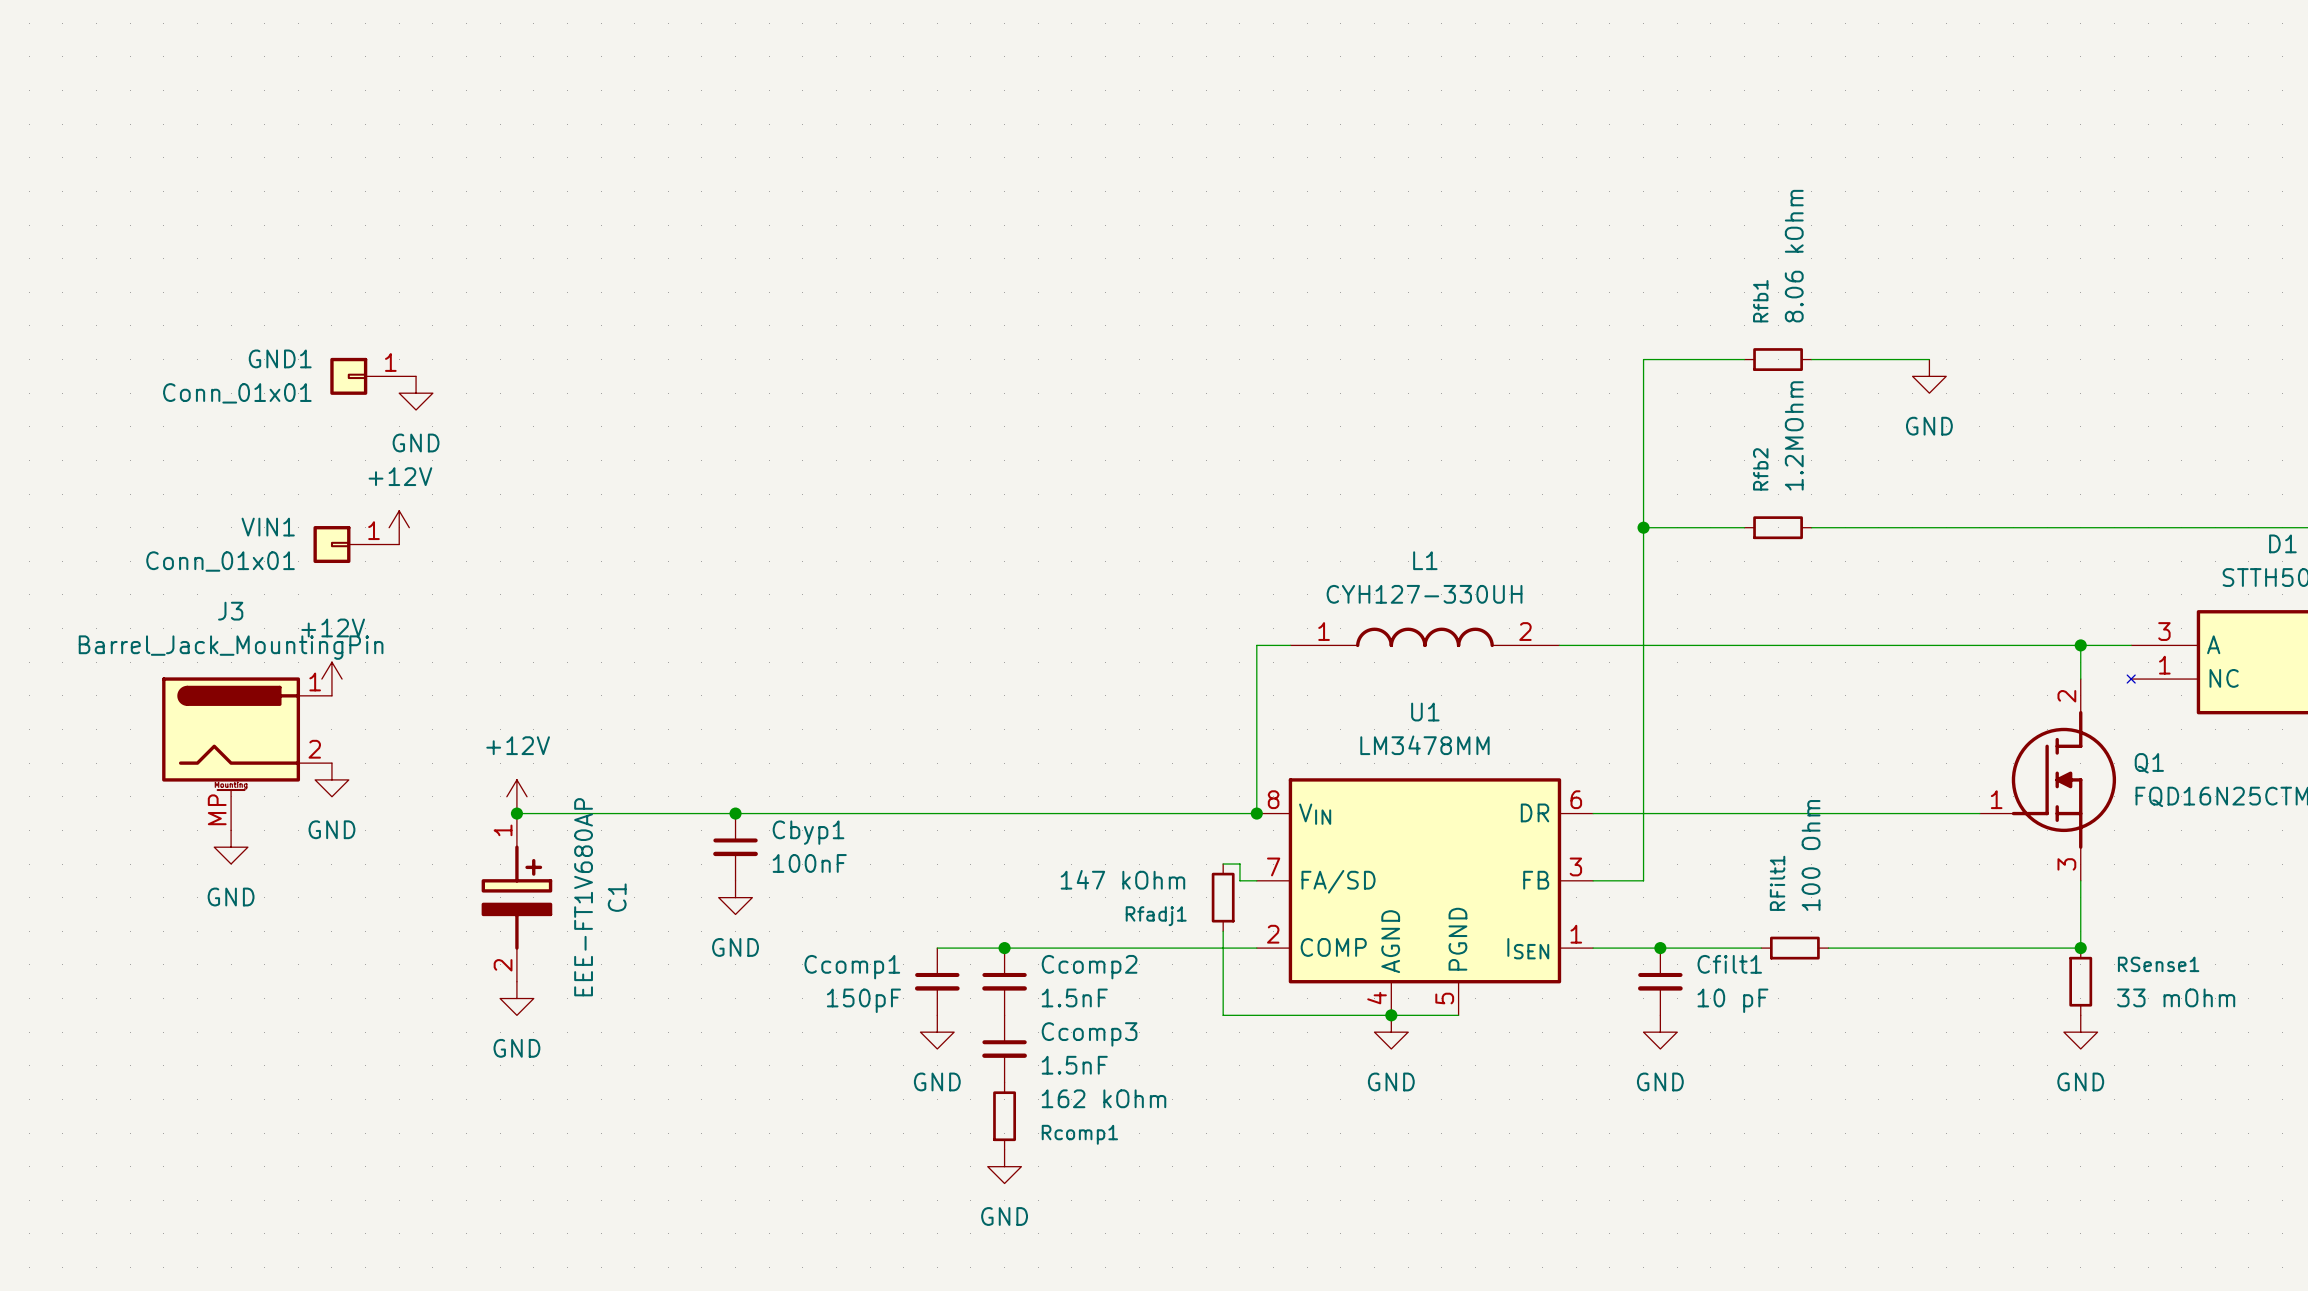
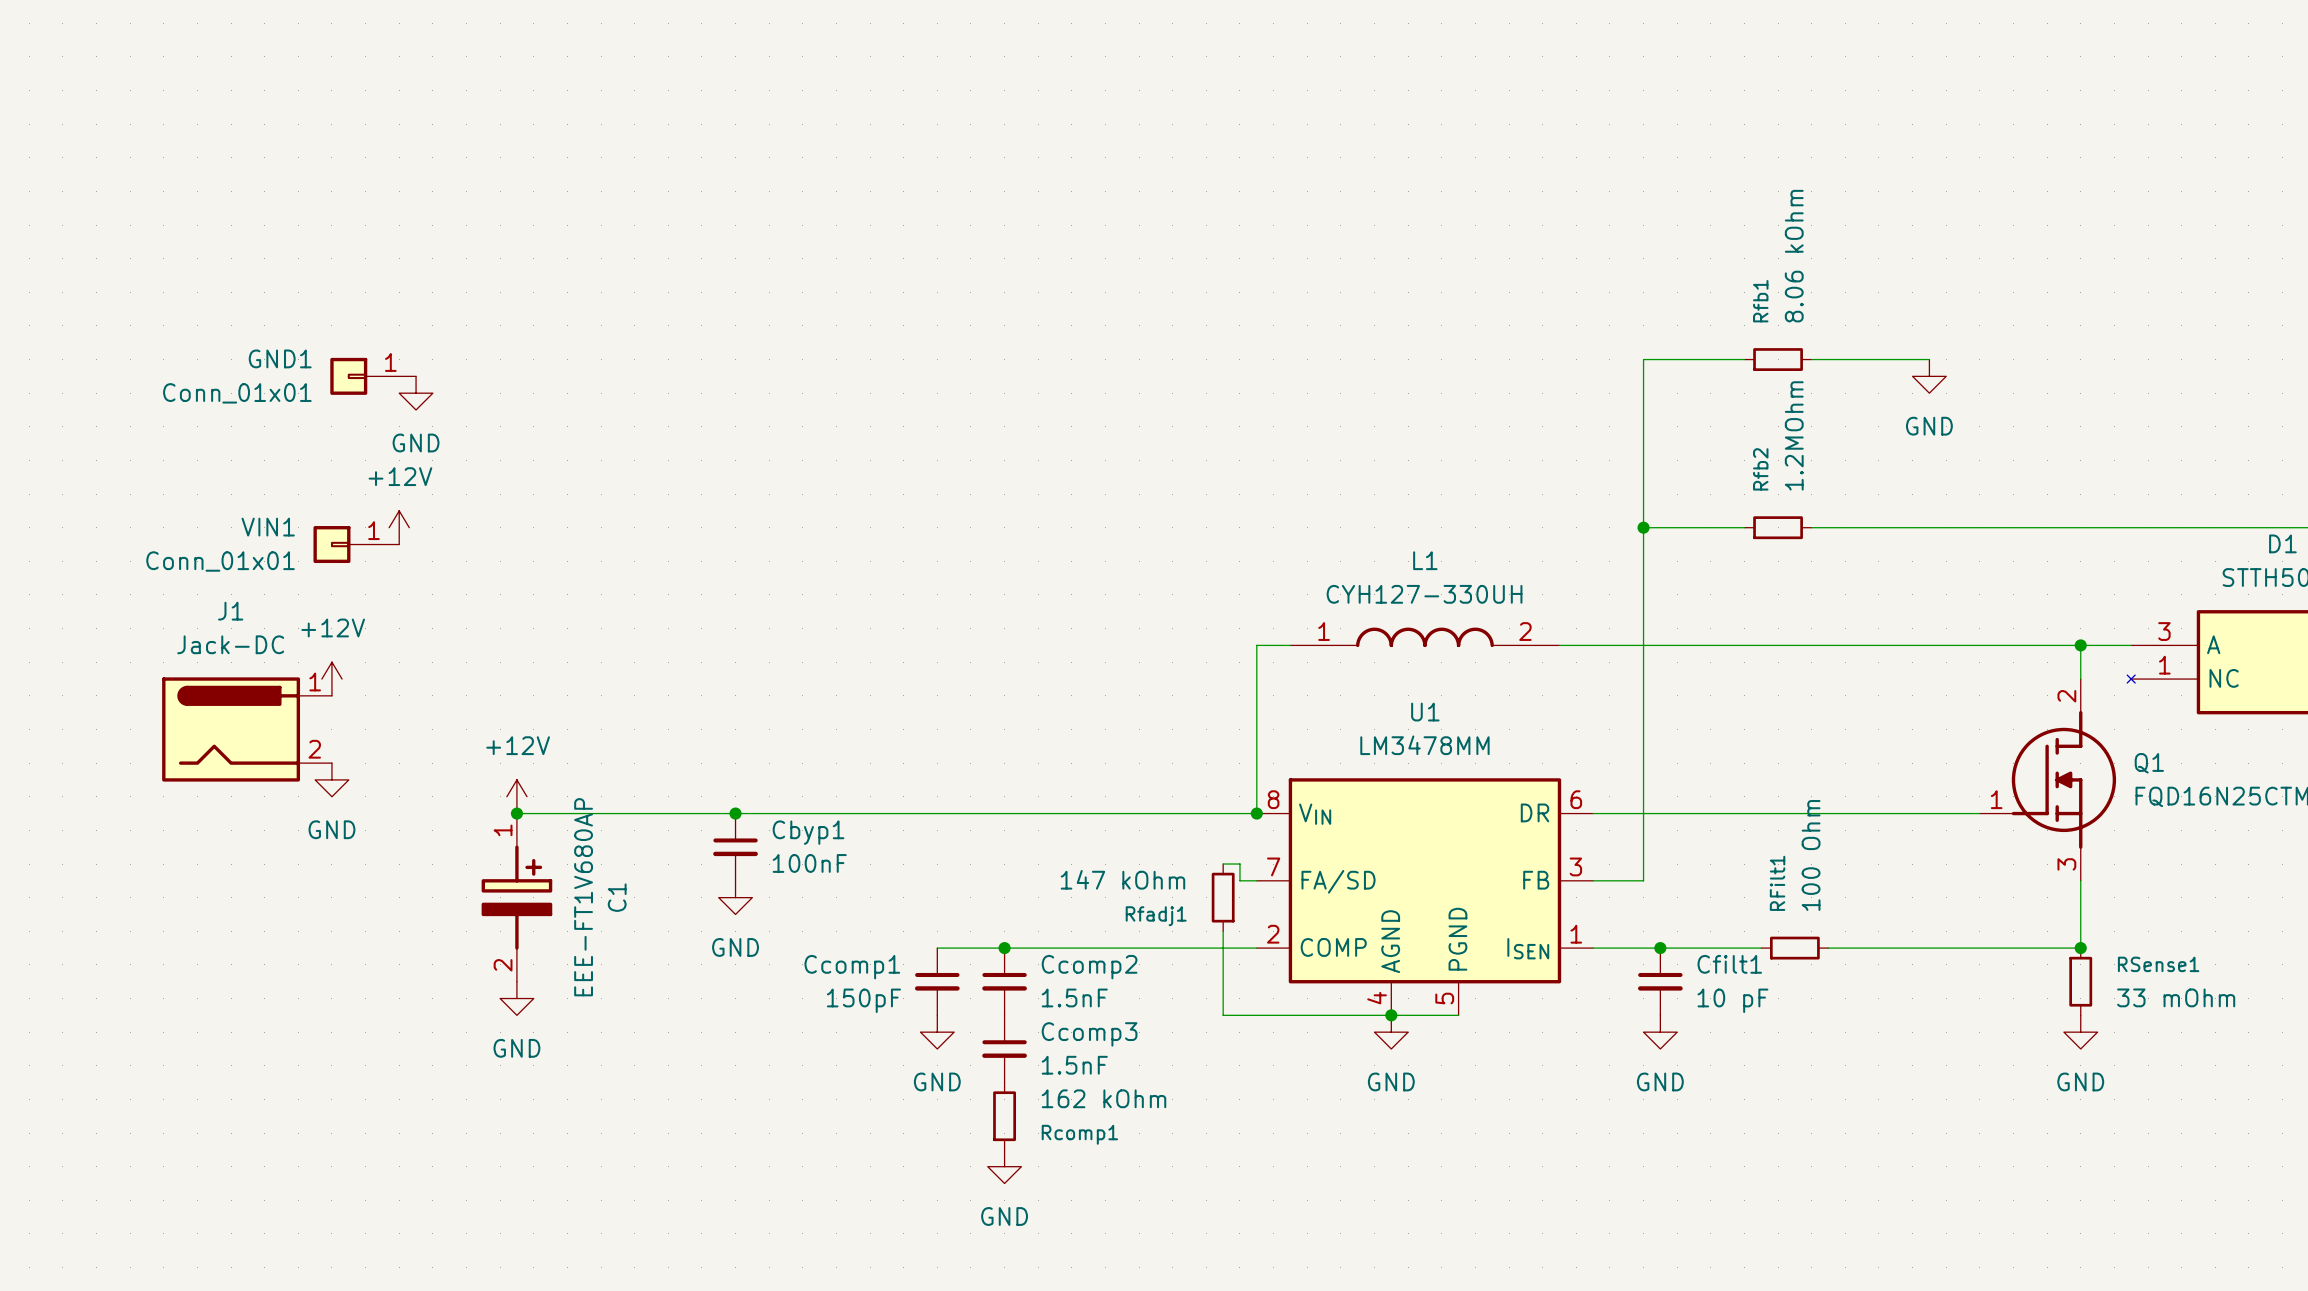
J1: none -> Jack-DC (247, 729)
J3: Barrel_Jack_MountingPin (247, 753) -> none
power symbol: GND (231, 847) -> none

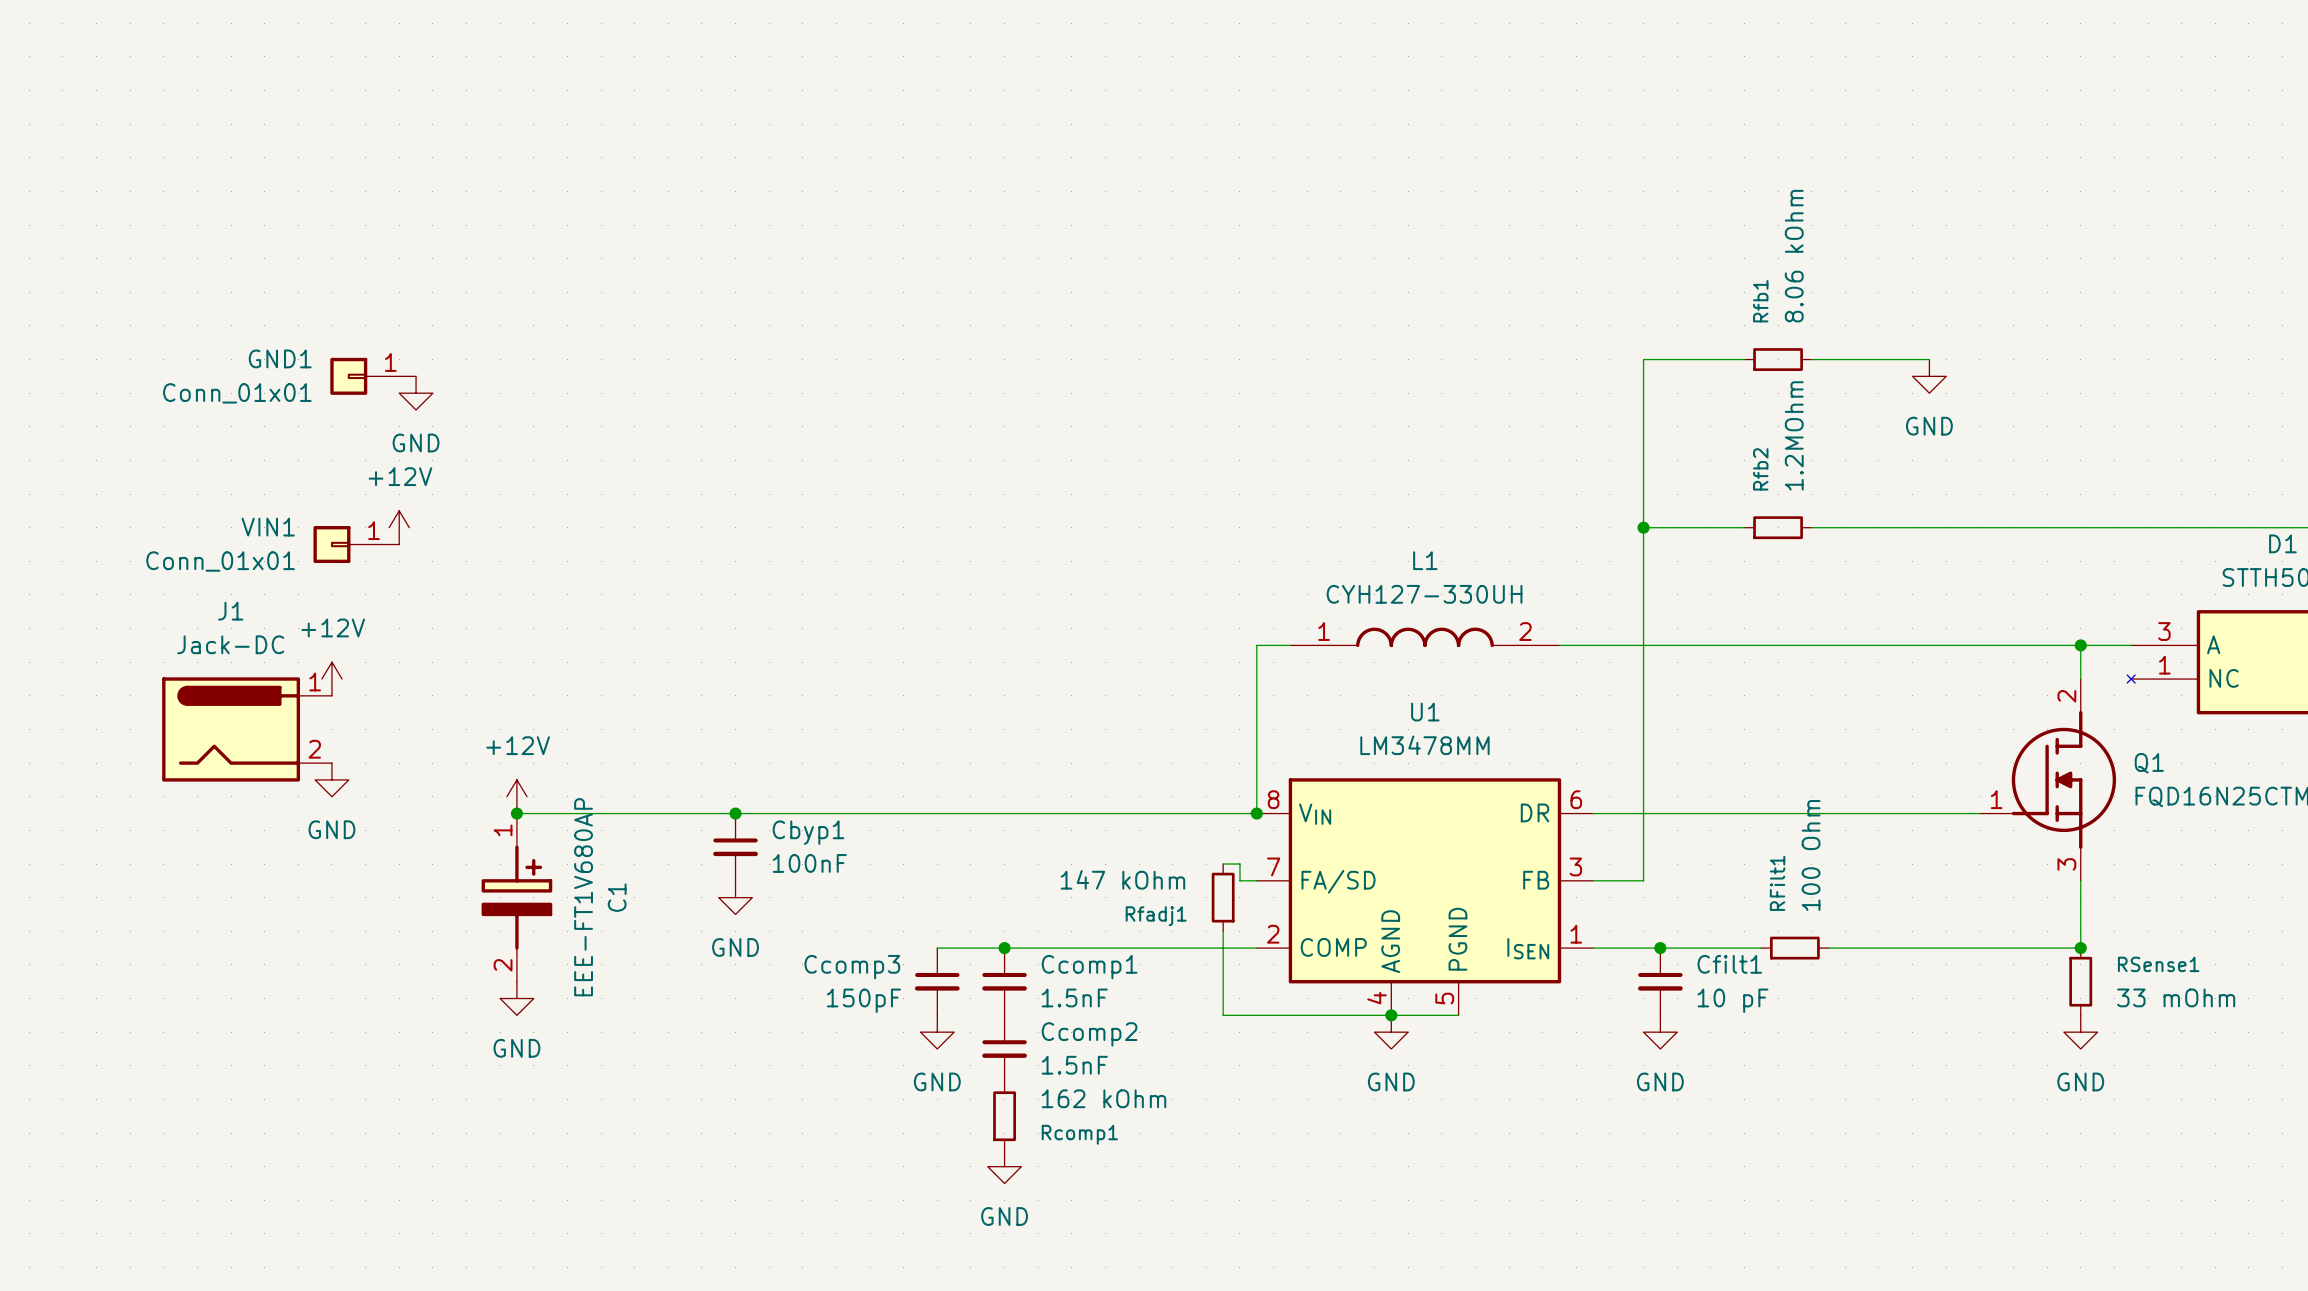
Ccomp1 name: Ccomp1 (852, 967) -> Ccomp3 (852, 967)
Ccomp2 name: Ccomp2 (1089, 967) -> Ccomp1 (1089, 967)
Ccomp3 name: Ccomp3 (1089, 1034) -> Ccomp2 (1089, 1034)

